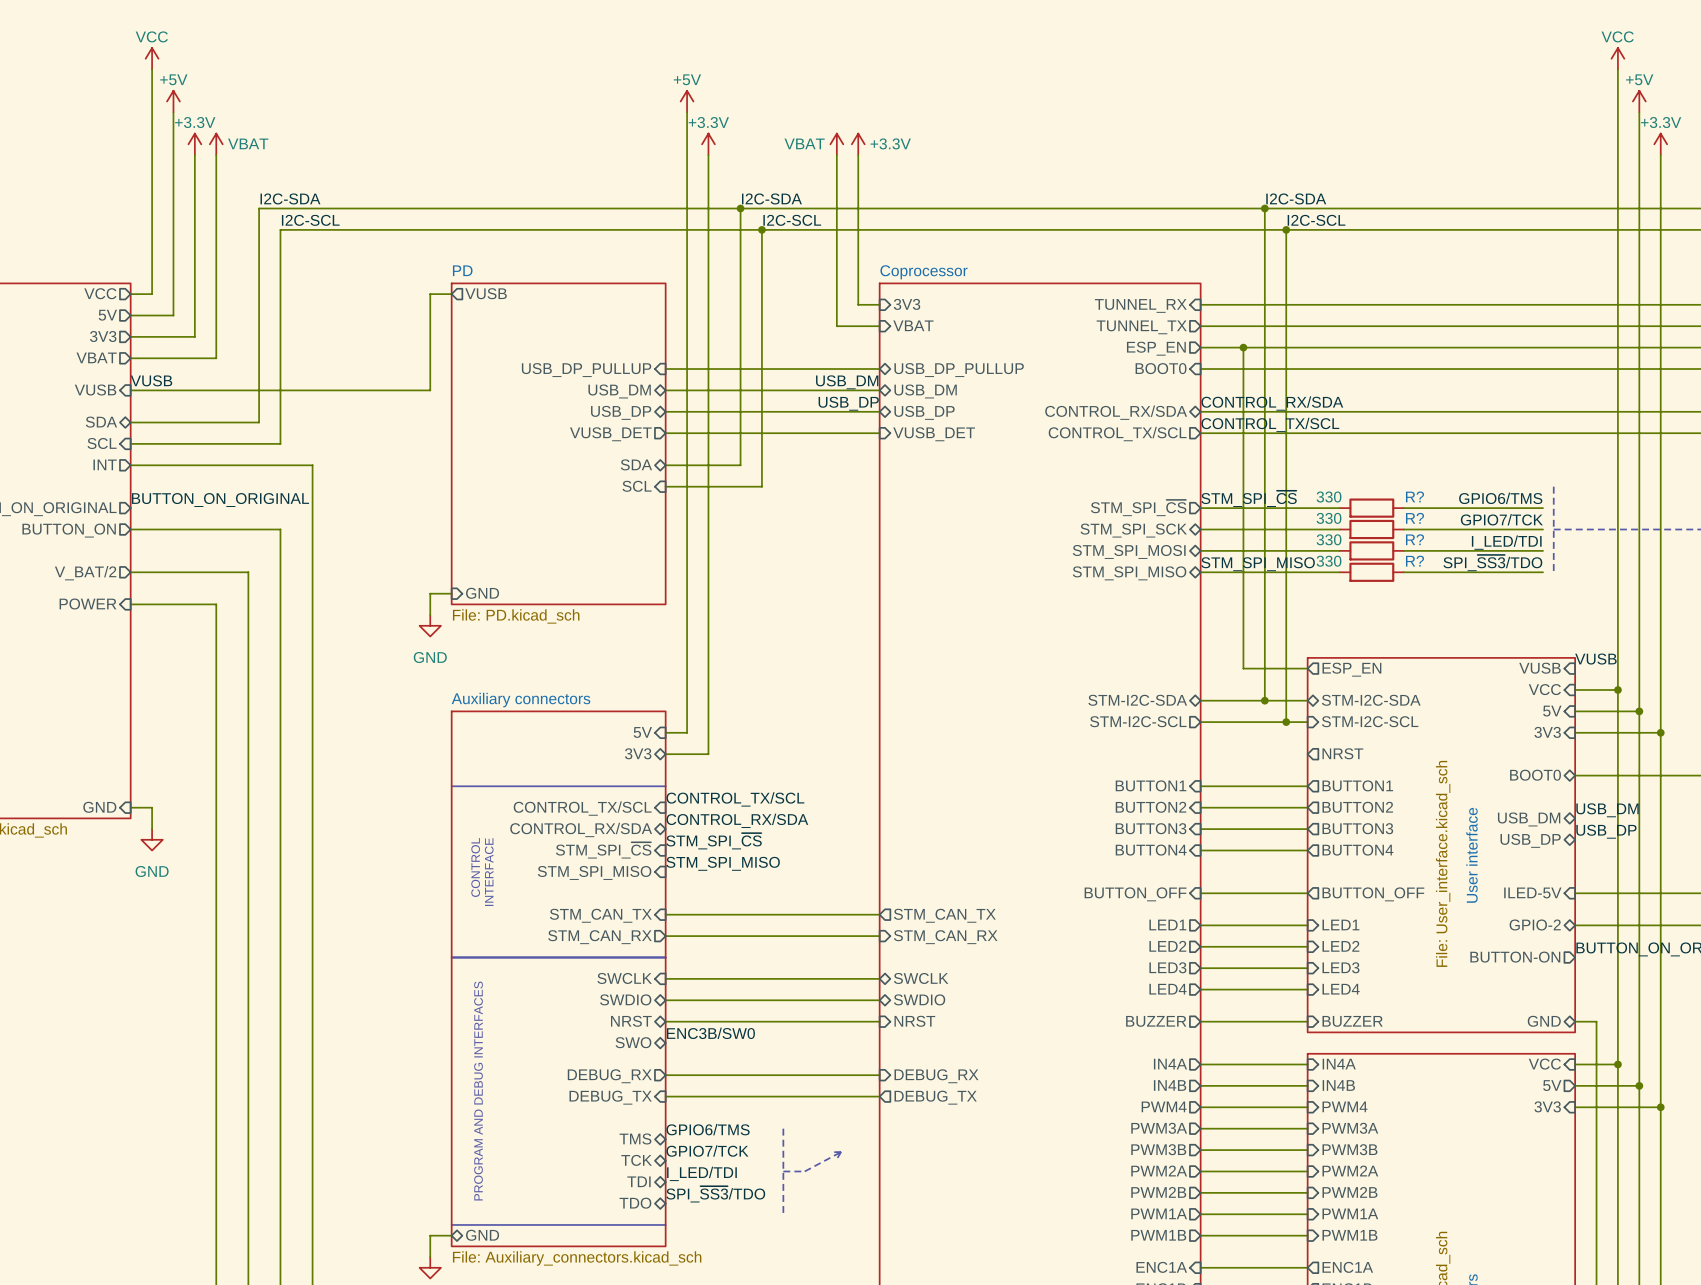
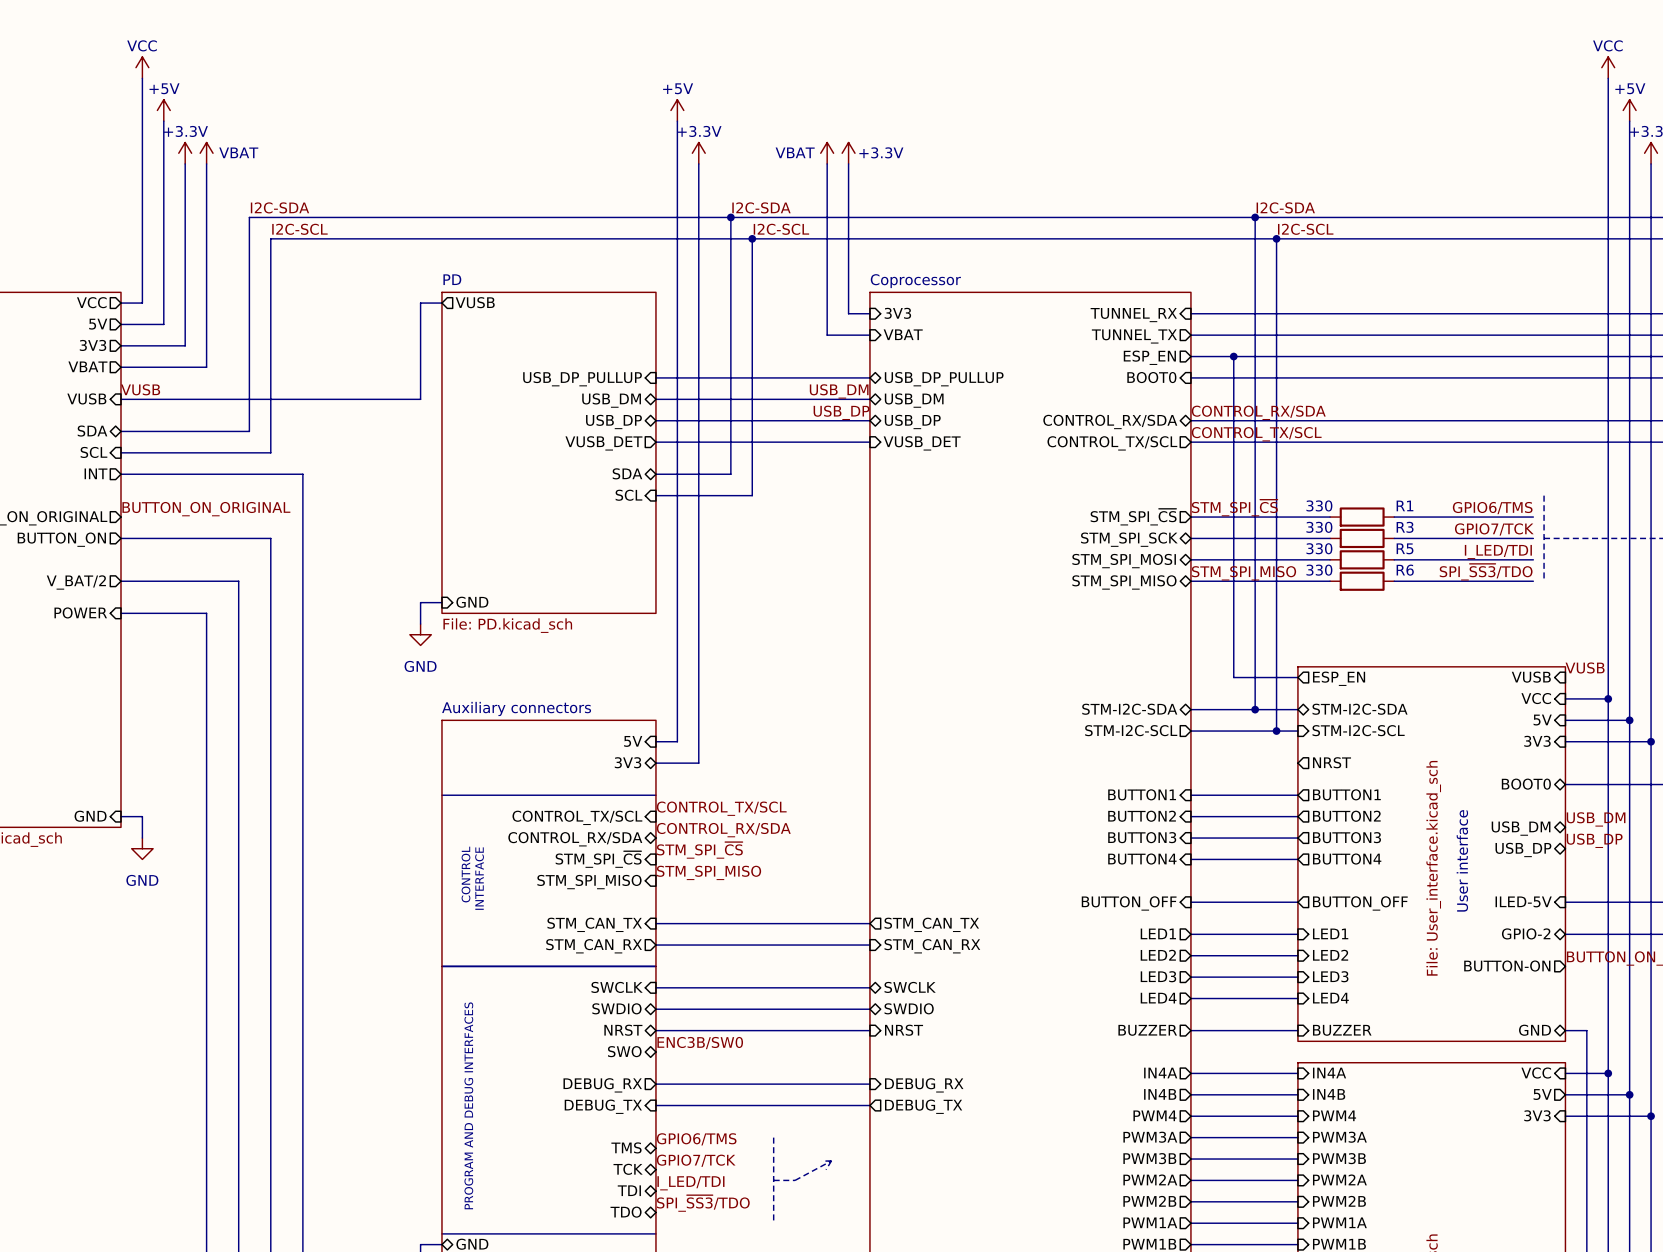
R? name: R? (1414, 496) -> R1 (1404, 505)
R? name: R? (1414, 518) -> R3 (1405, 527)
R? name: R? (1414, 539) -> R5 (1405, 548)
R? name: R? (1414, 561) -> R6 (1405, 570)

